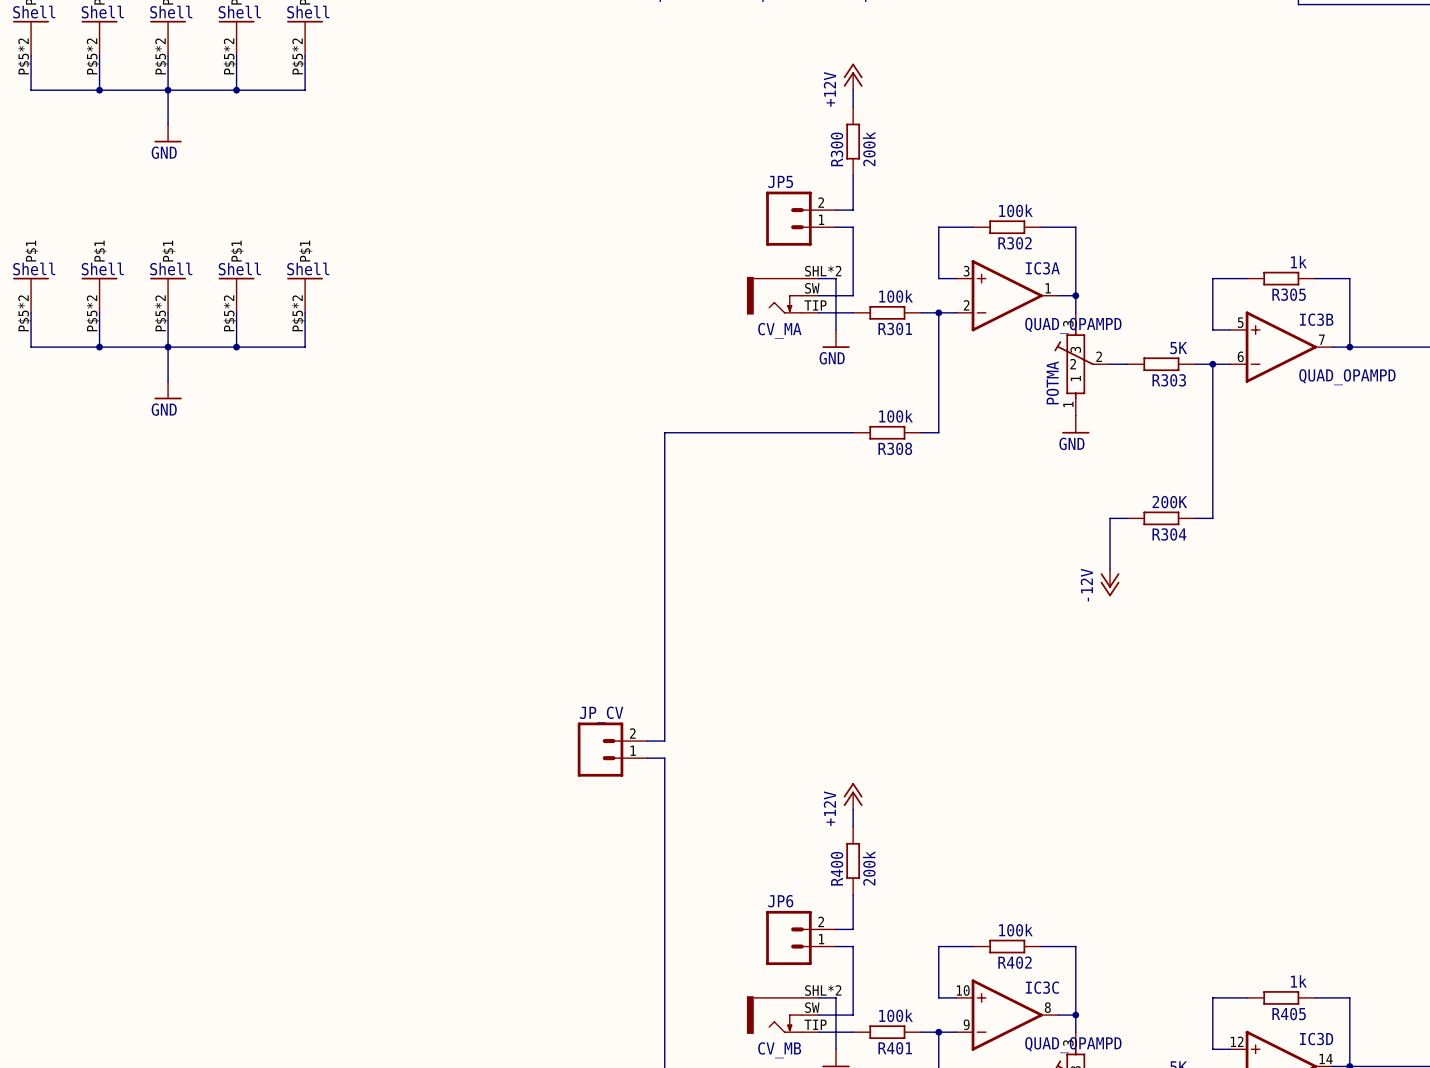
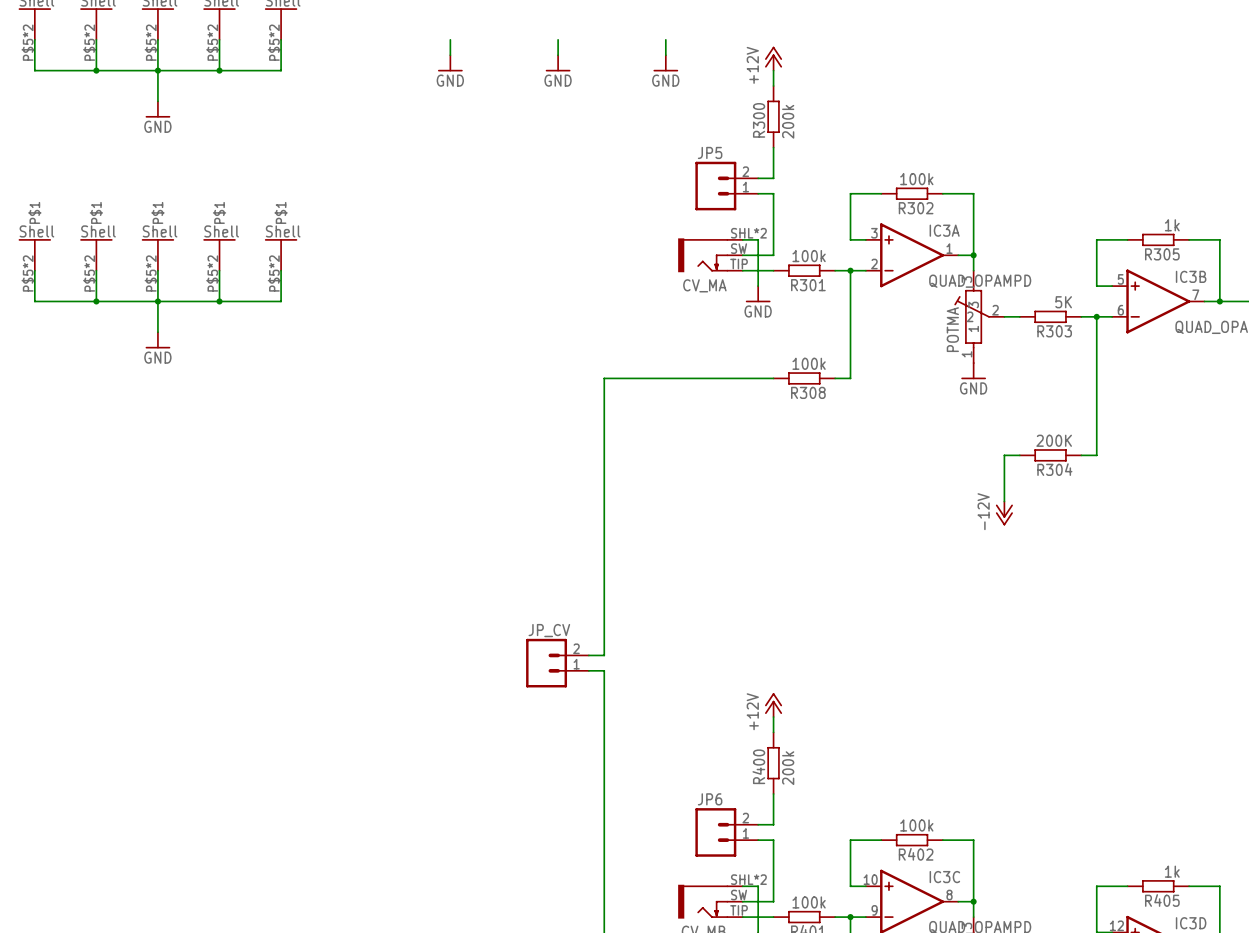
wire: none -> (450, 39) (450, 55)
wire: none -> (558, 39) (558, 55)
wire: none -> (665, 39) (665, 55)
power symbol: none -> GND (450, 63)
power symbol: none -> GND (558, 63)
power symbol: none -> GND (665, 63)

